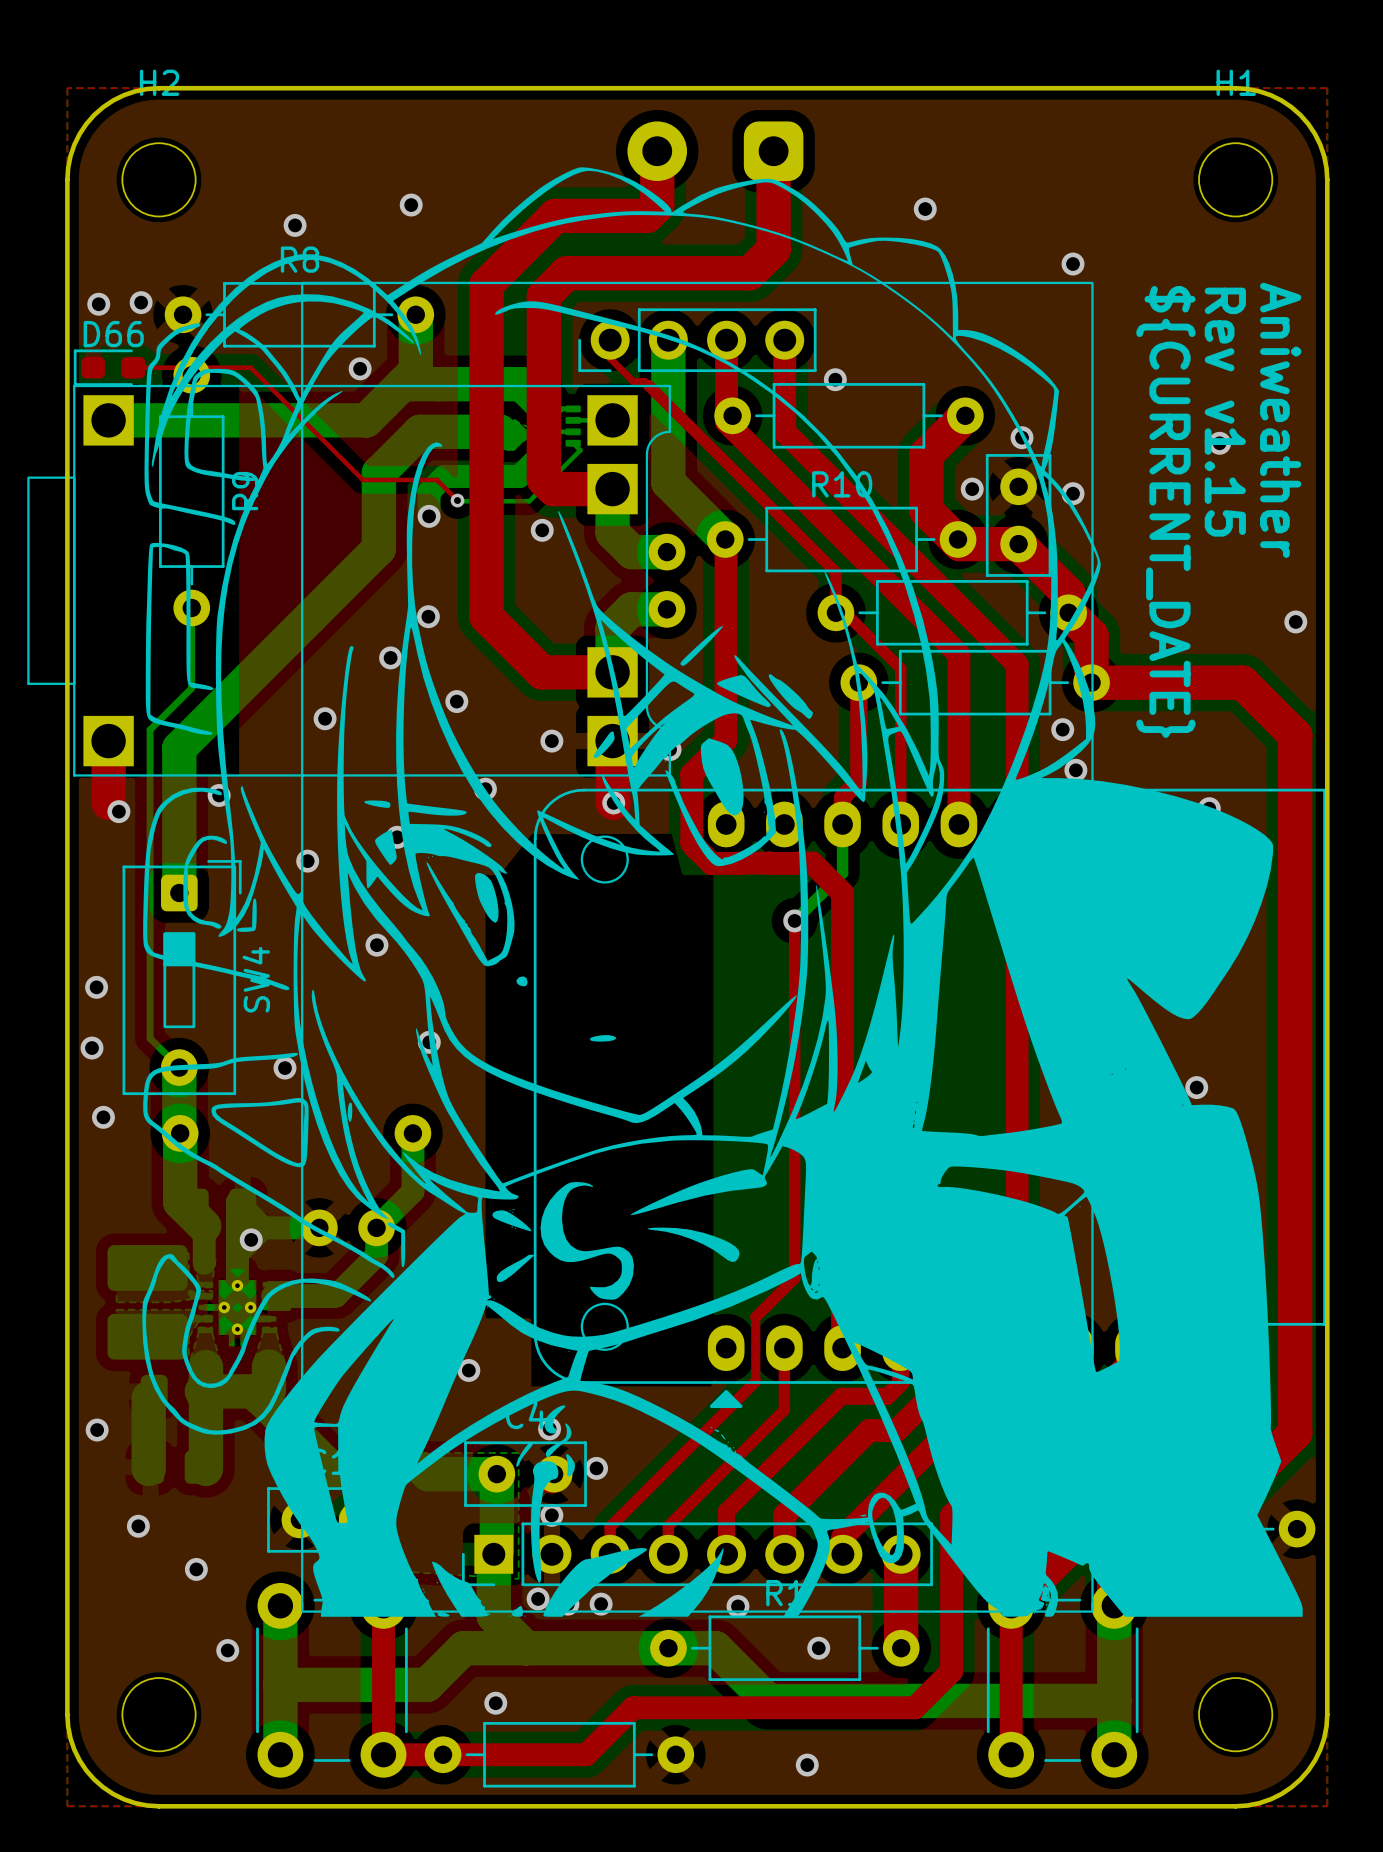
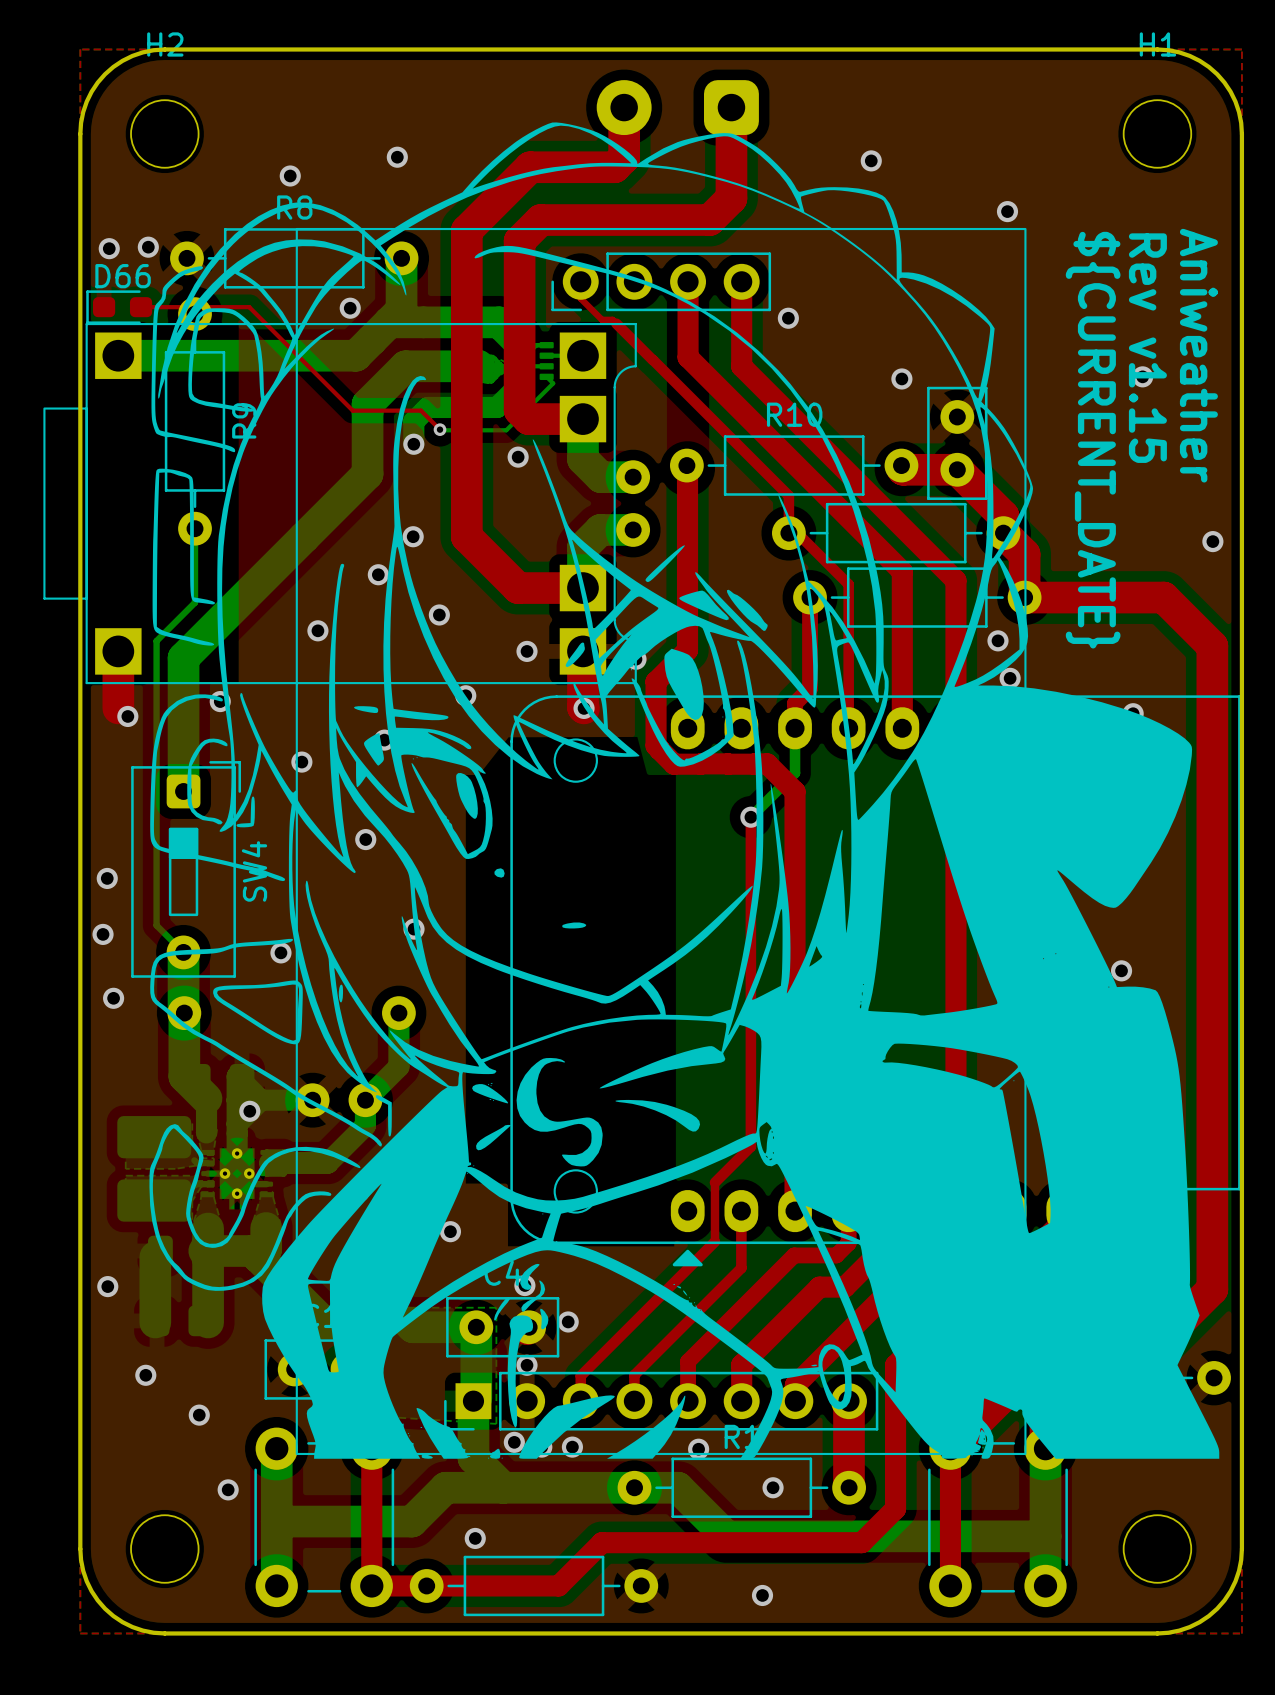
bottom track: (668, 340) (668, 482) (725, 539) -> none
part: (848, 415) -> none
top track: (965, 415) (926, 454) (926, 510) (958, 542) -> none
via: (1022, 437) -> none
via: none -> (901, 378)
via: (972, 489) -> none
via: (1073, 493) -> none

